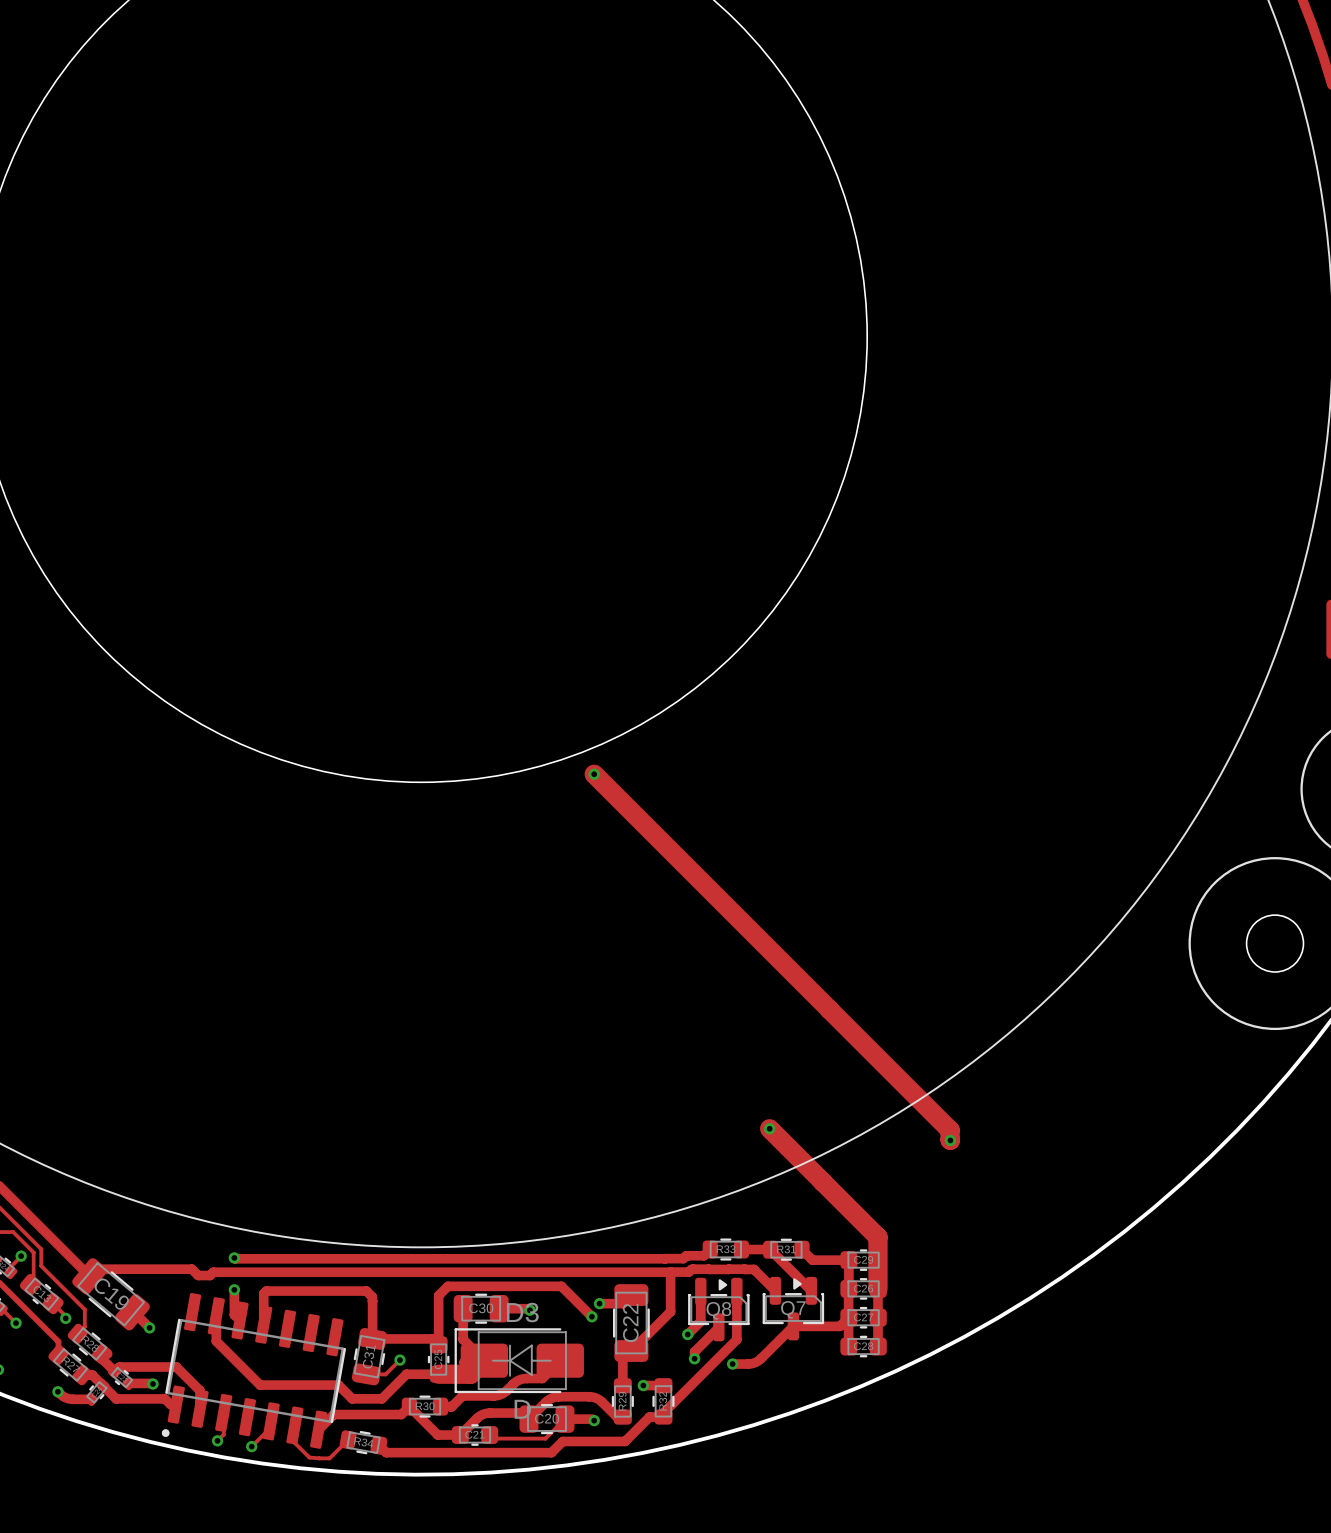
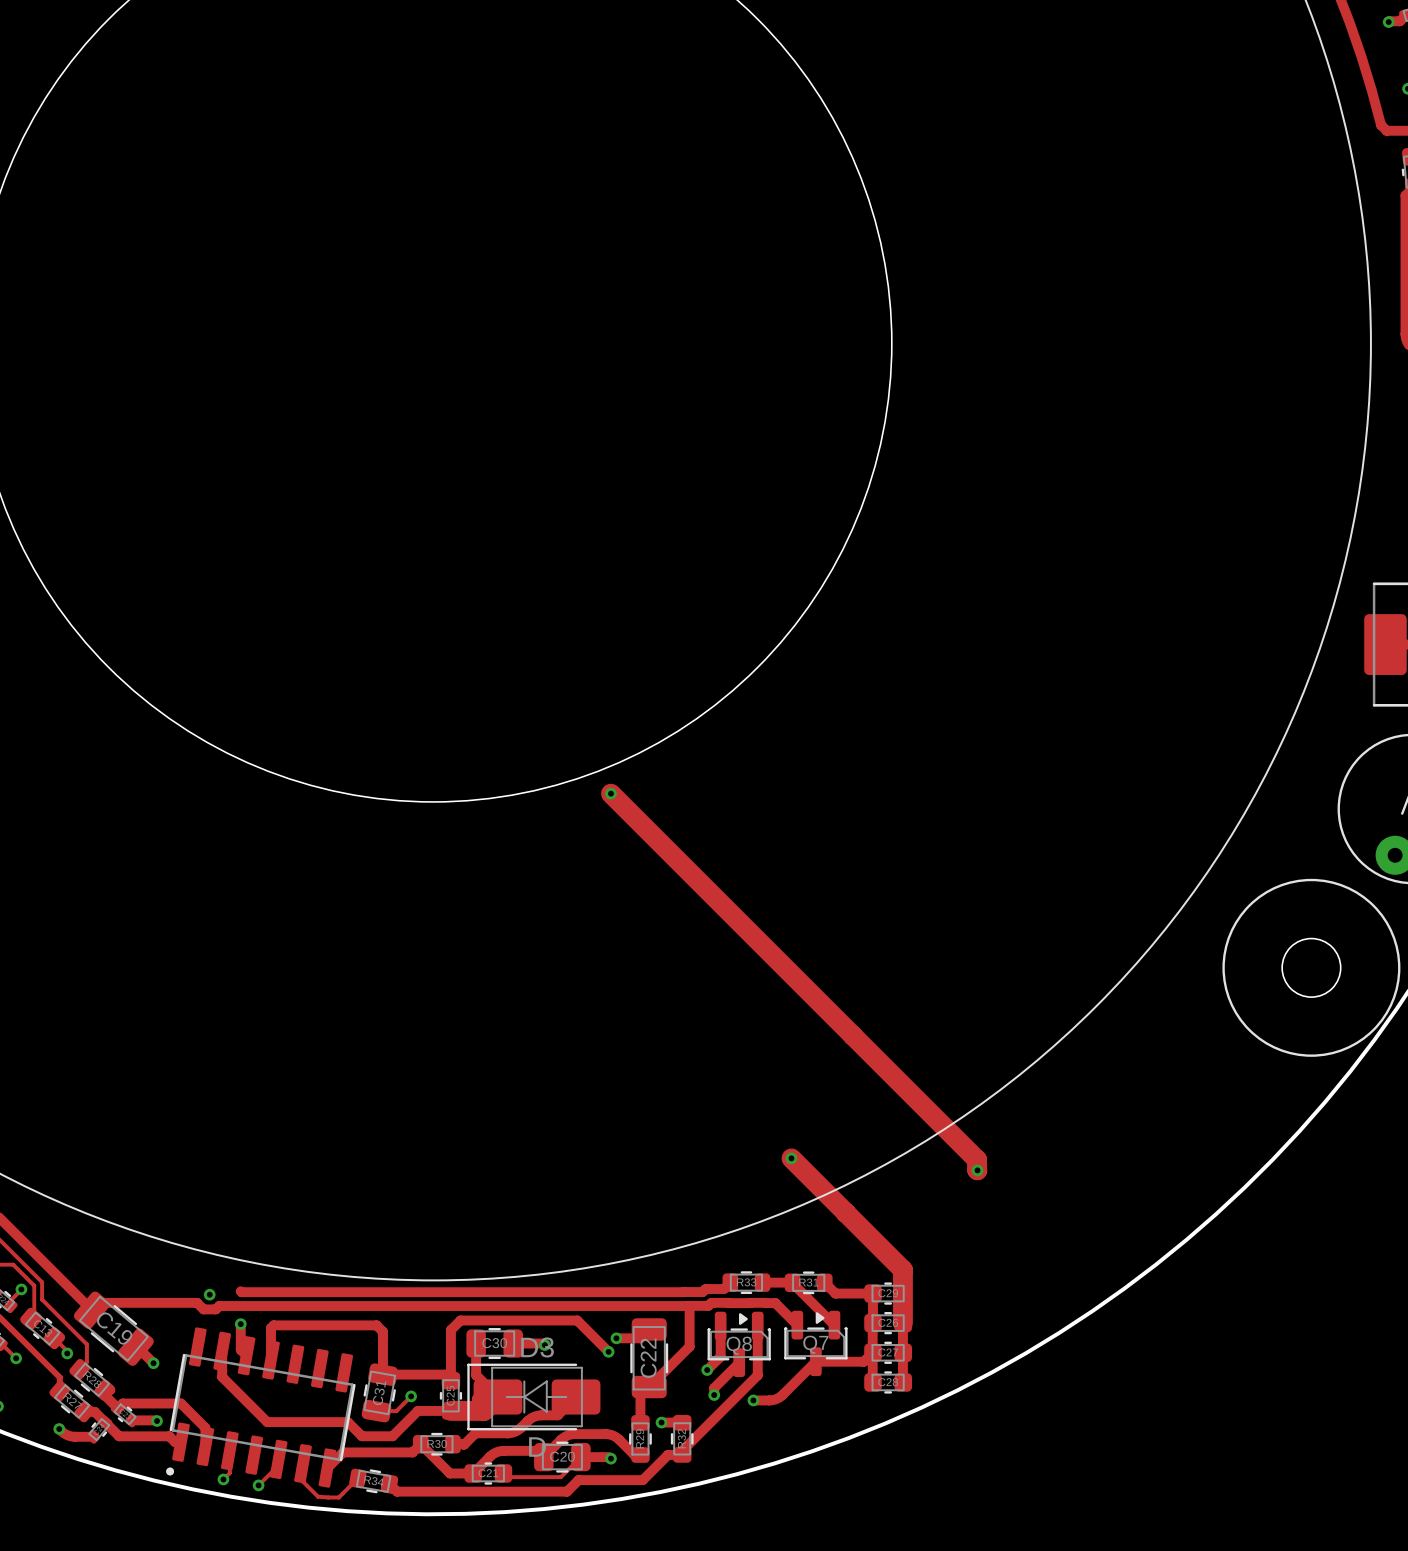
via position: (234, 1257) -> (209, 1294)

